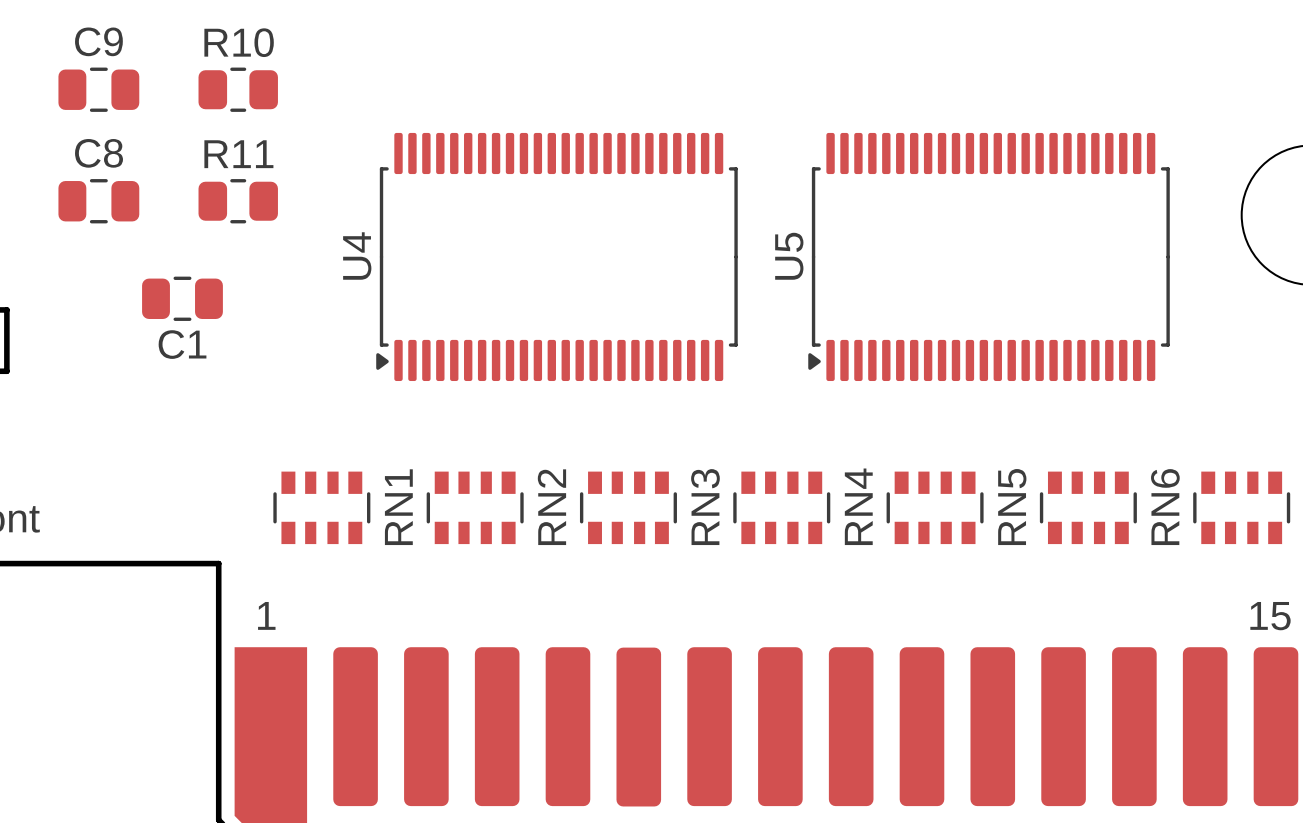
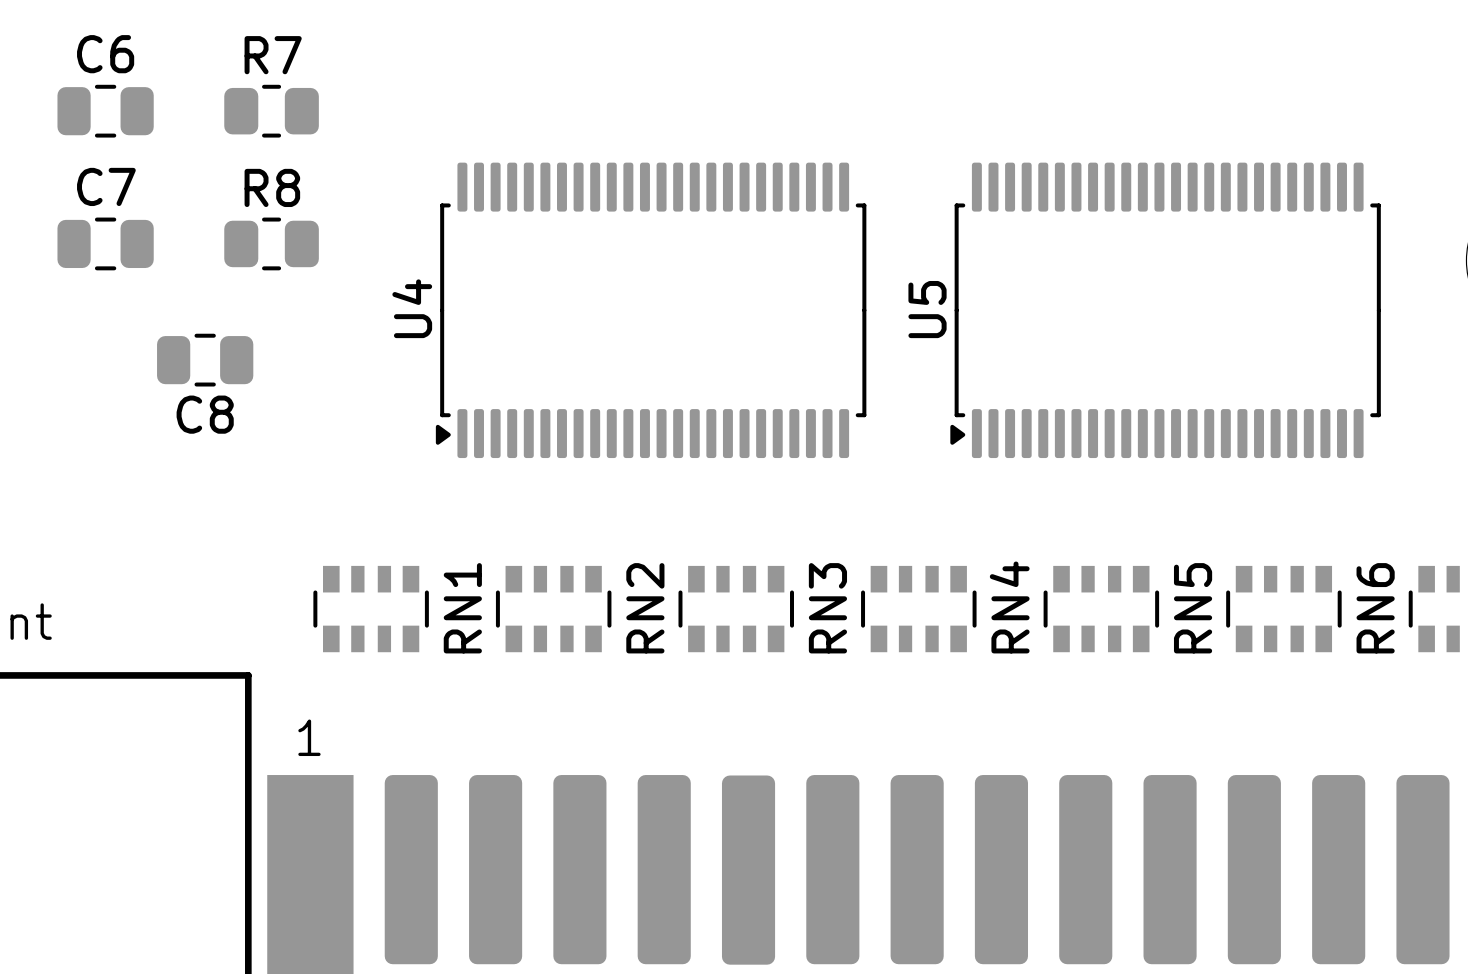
C9 name: C9 (98, 41) -> C6 (105, 54)
R10 name: R10 (239, 42) -> R7 (273, 55)
C8 name: C8 (99, 153) -> C7 (106, 186)
R11 name: R11 (238, 154) -> R8 (272, 187)
C1 name: C1 (182, 344) -> C8 (205, 414)

